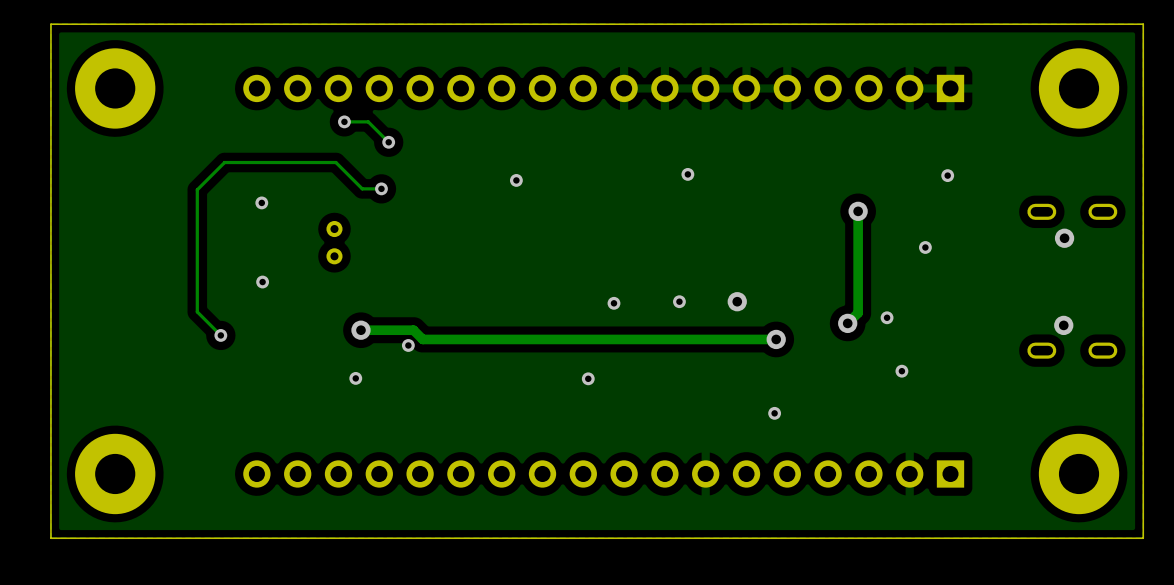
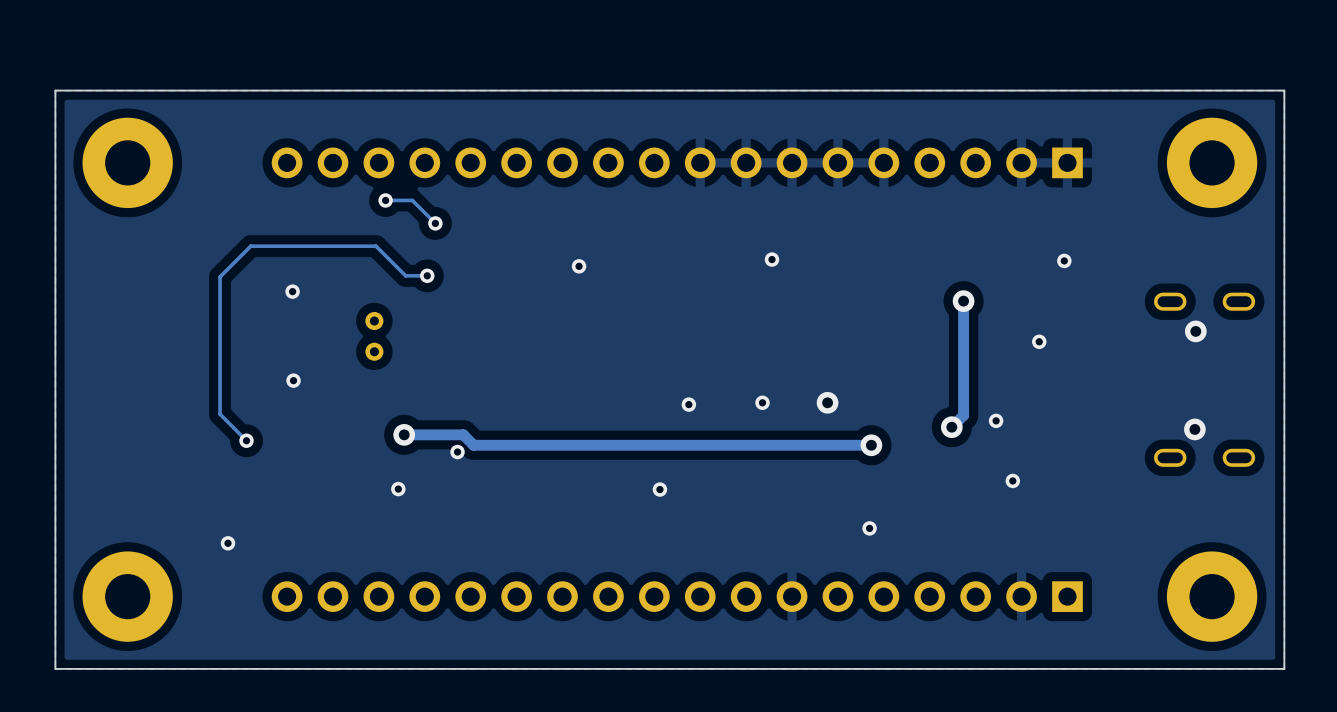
via: none -> (228, 543)

